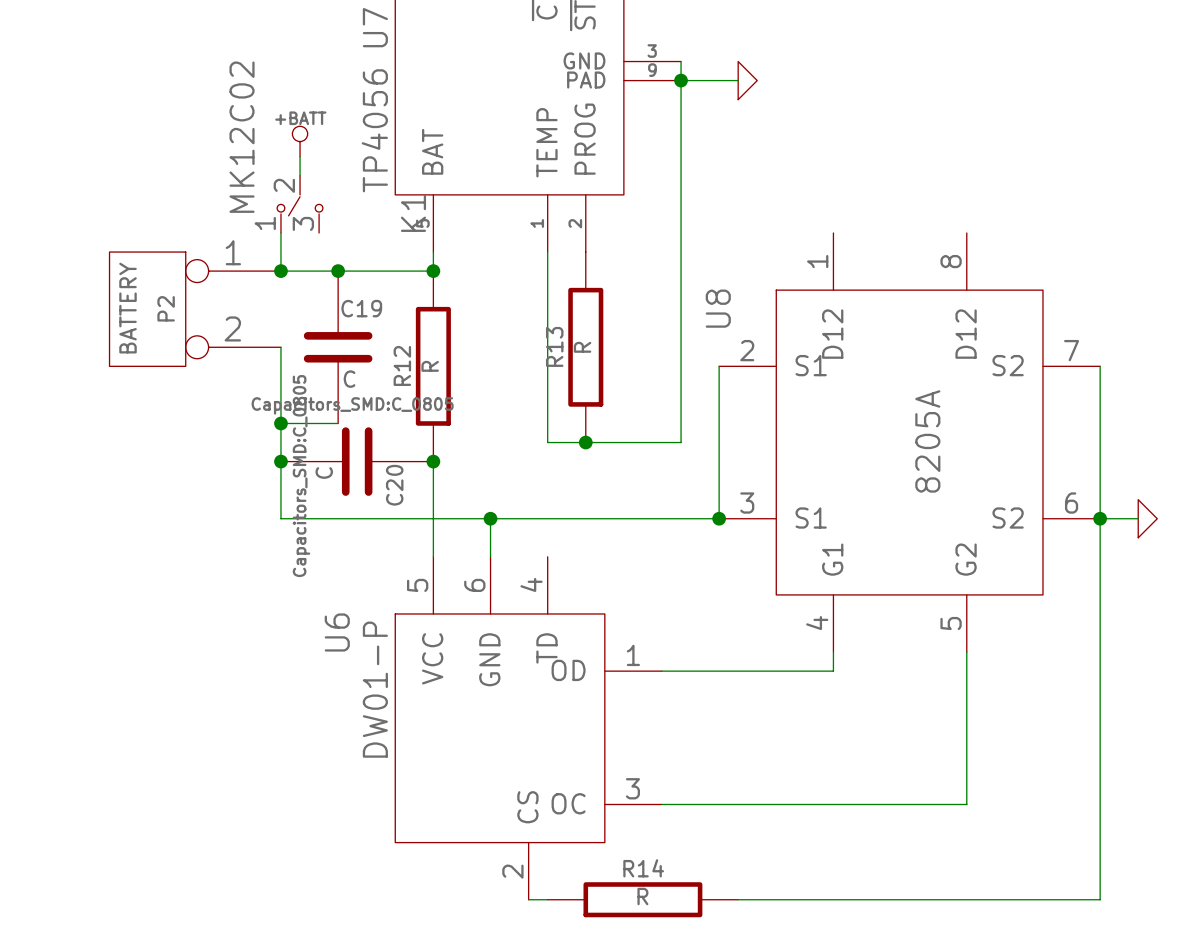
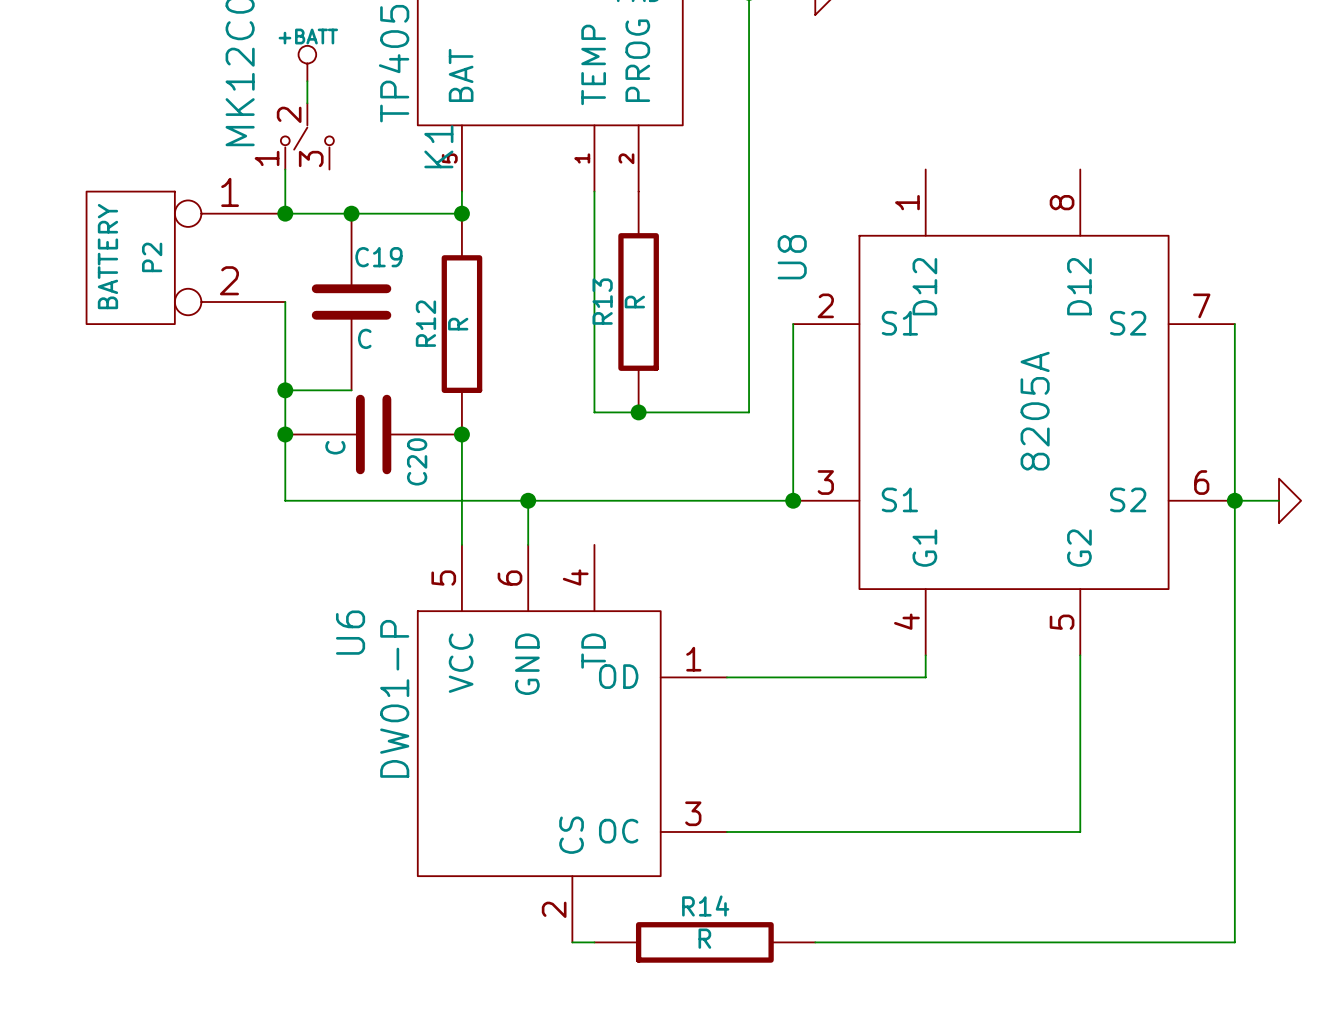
C19 text: Capacitors_SMD:C_0805 (352, 405) -> none
C20 text: Capacitors_SMD:C_0805 (301, 476) -> none

